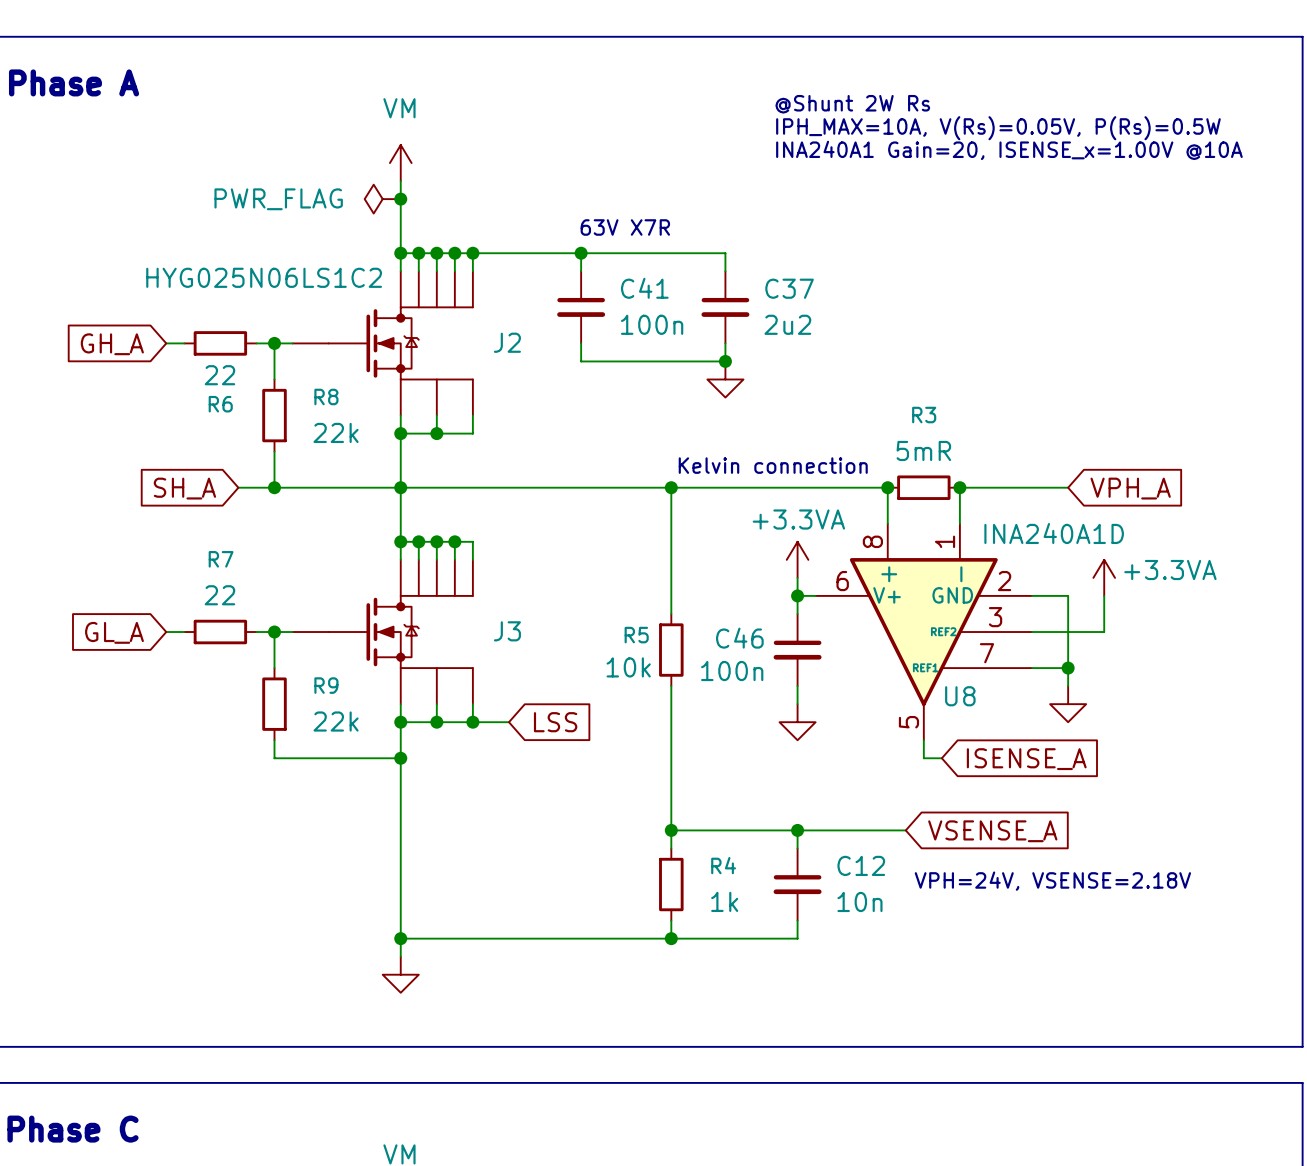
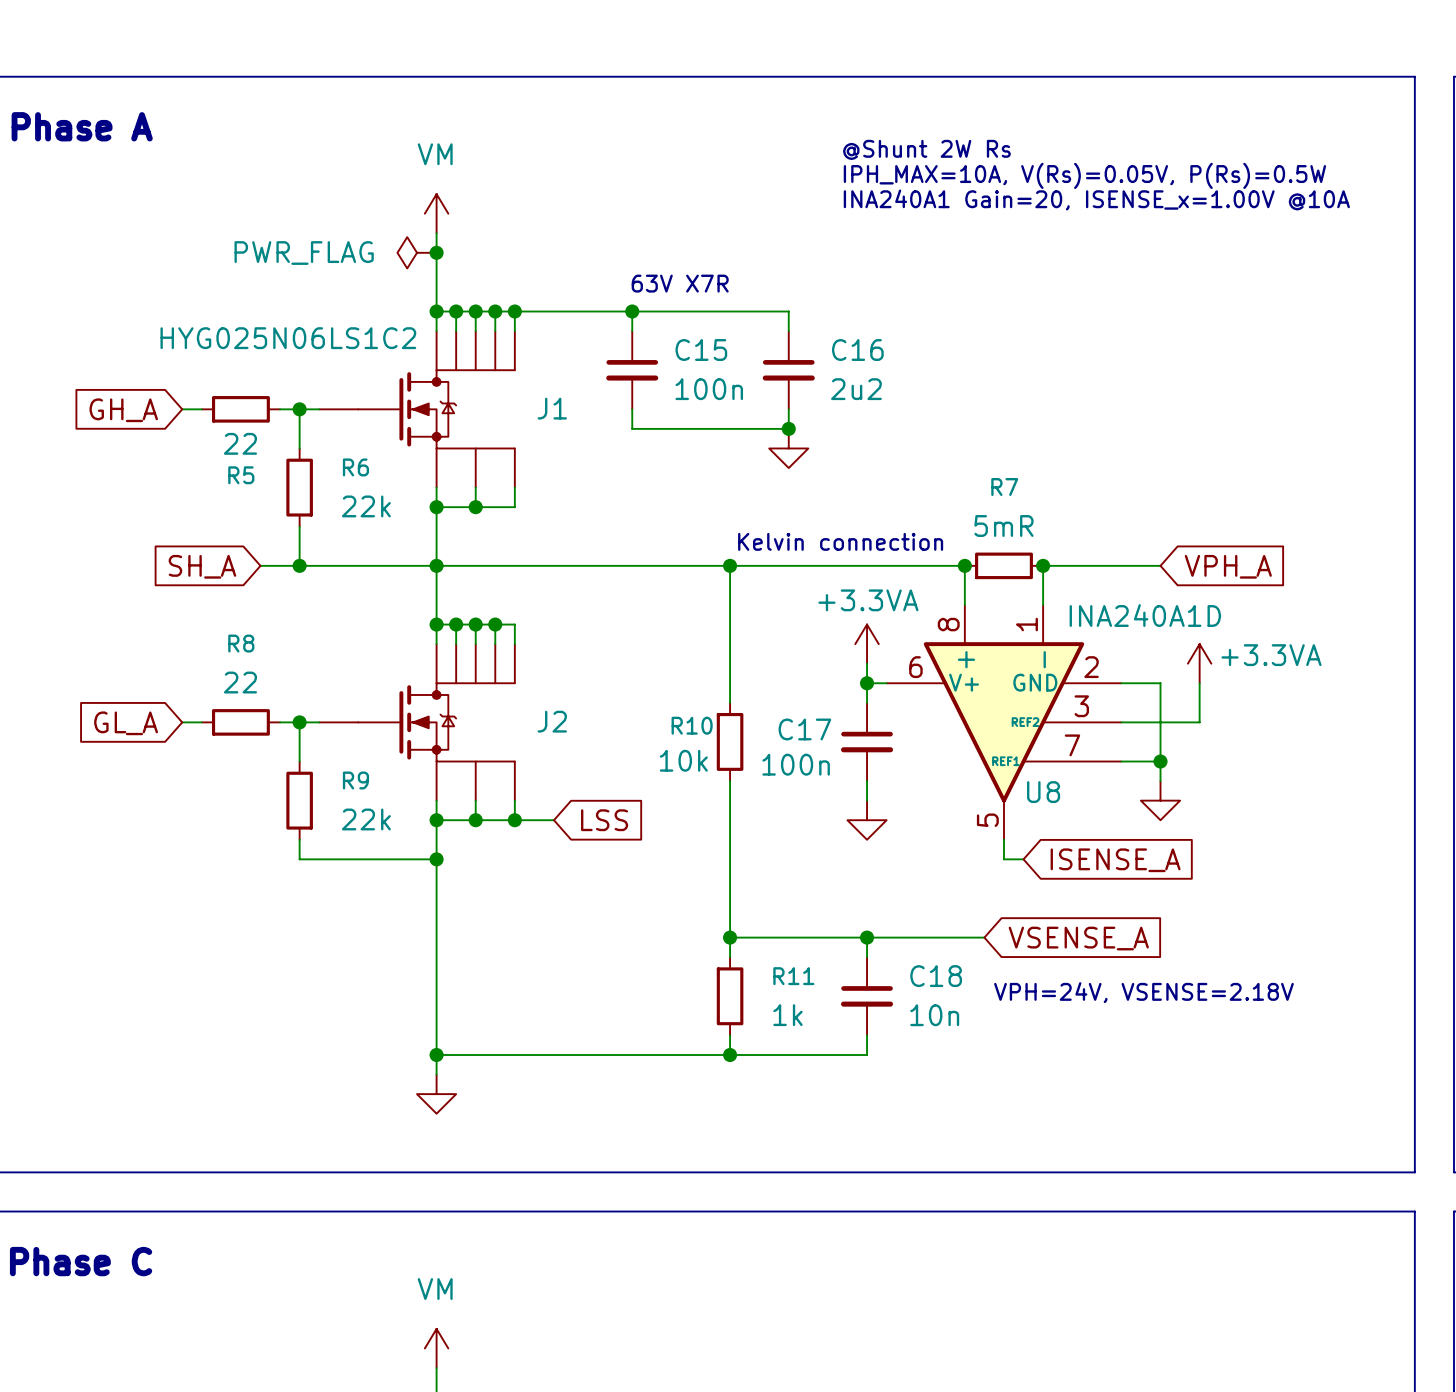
C41 name: C41 (644, 288) -> C15 (701, 350)
C37 name: C37 (789, 288) -> C16 (857, 350)
J2 name: J2 (507, 342) -> J1 (552, 408)
R8 name: R8 (326, 396) -> R6 (355, 467)
R6 name: R6 (220, 404) -> R5 (241, 475)
R3 name: R3 (924, 415) -> R7 (1004, 487)
R7 name: R7 (221, 559) -> R8 (241, 643)
J3 name: J3 (507, 631) -> J2 (552, 721)
R5 name: R5 (636, 635) -> R10 (692, 725)
C46 name: C46 (739, 638) -> C17 (804, 729)
R4 name: R4 (723, 865) -> R11 (793, 976)
C12 name: C12 (861, 865) -> C18 (936, 976)

